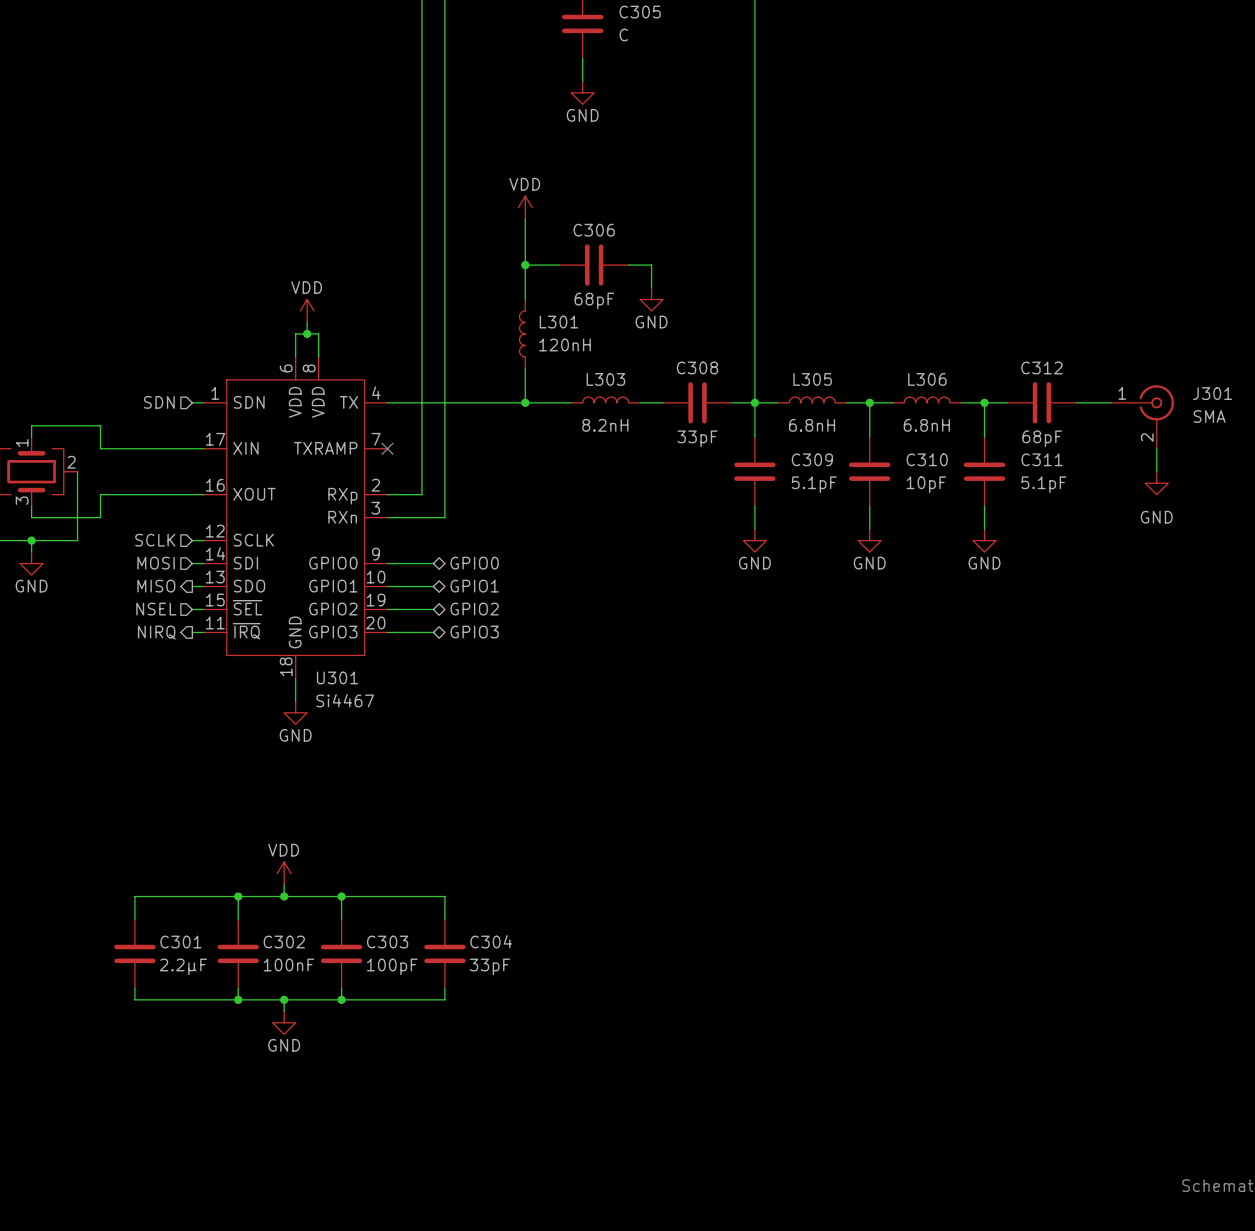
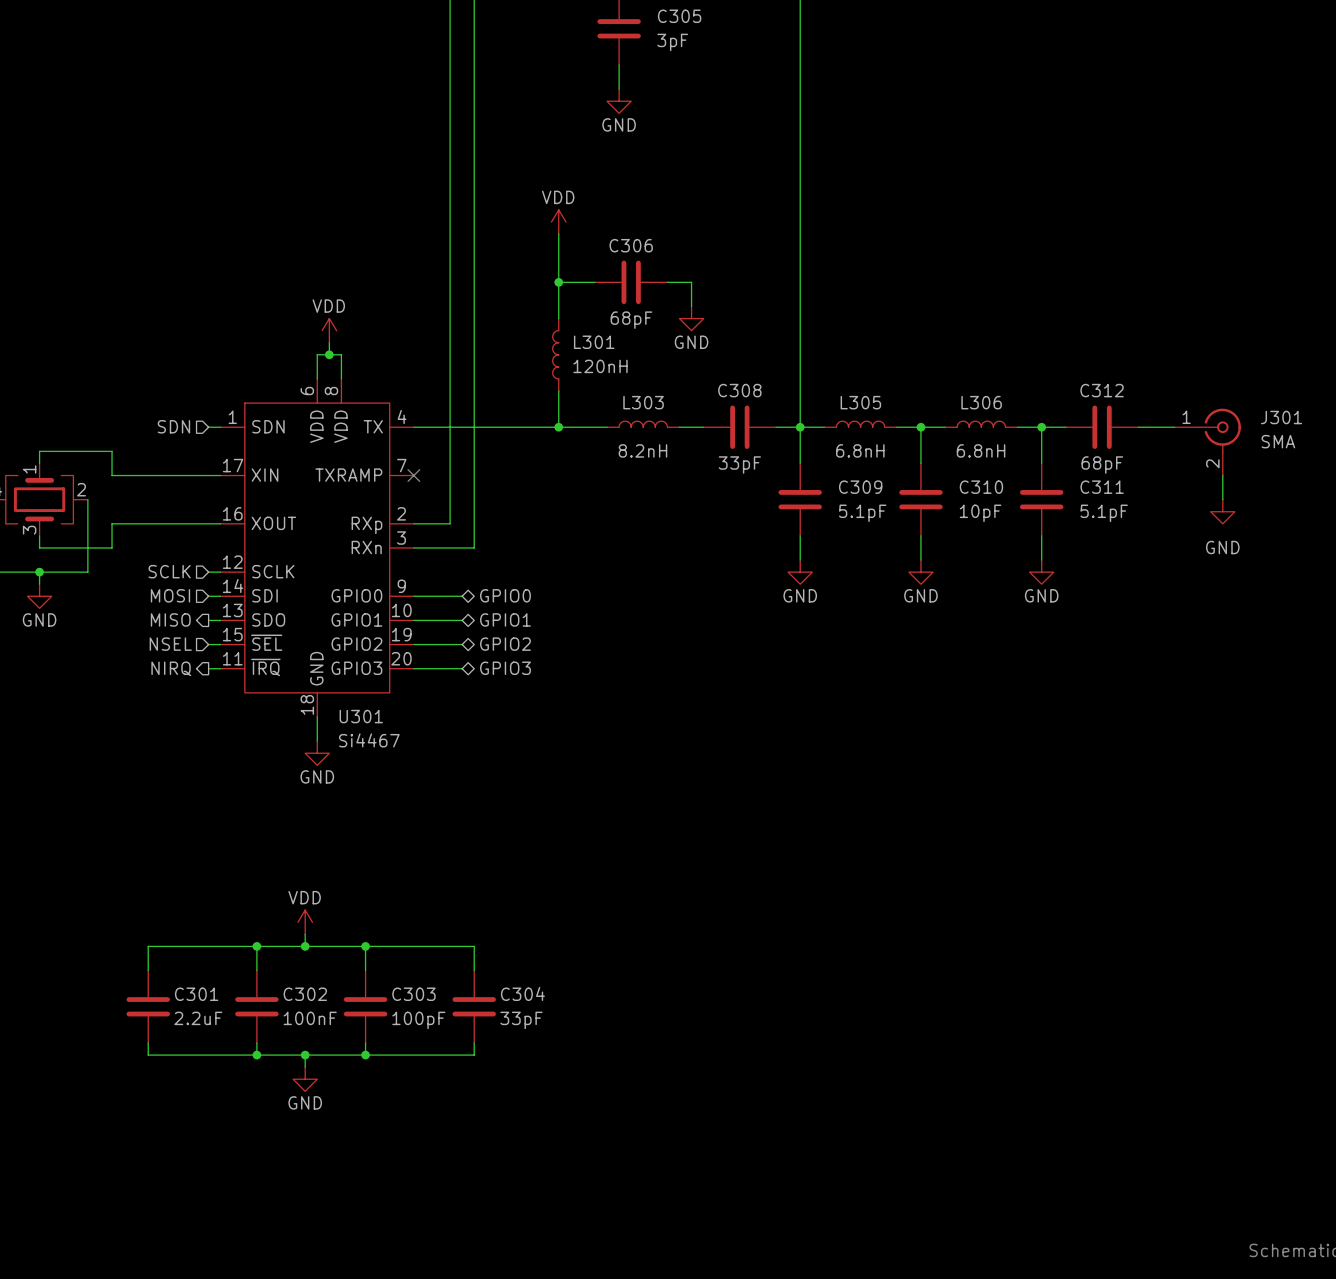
C305 value: C (623, 35) -> 3pF (672, 42)
C301 value: 2.2μF (183, 966) -> 2.2uF (198, 1018)

